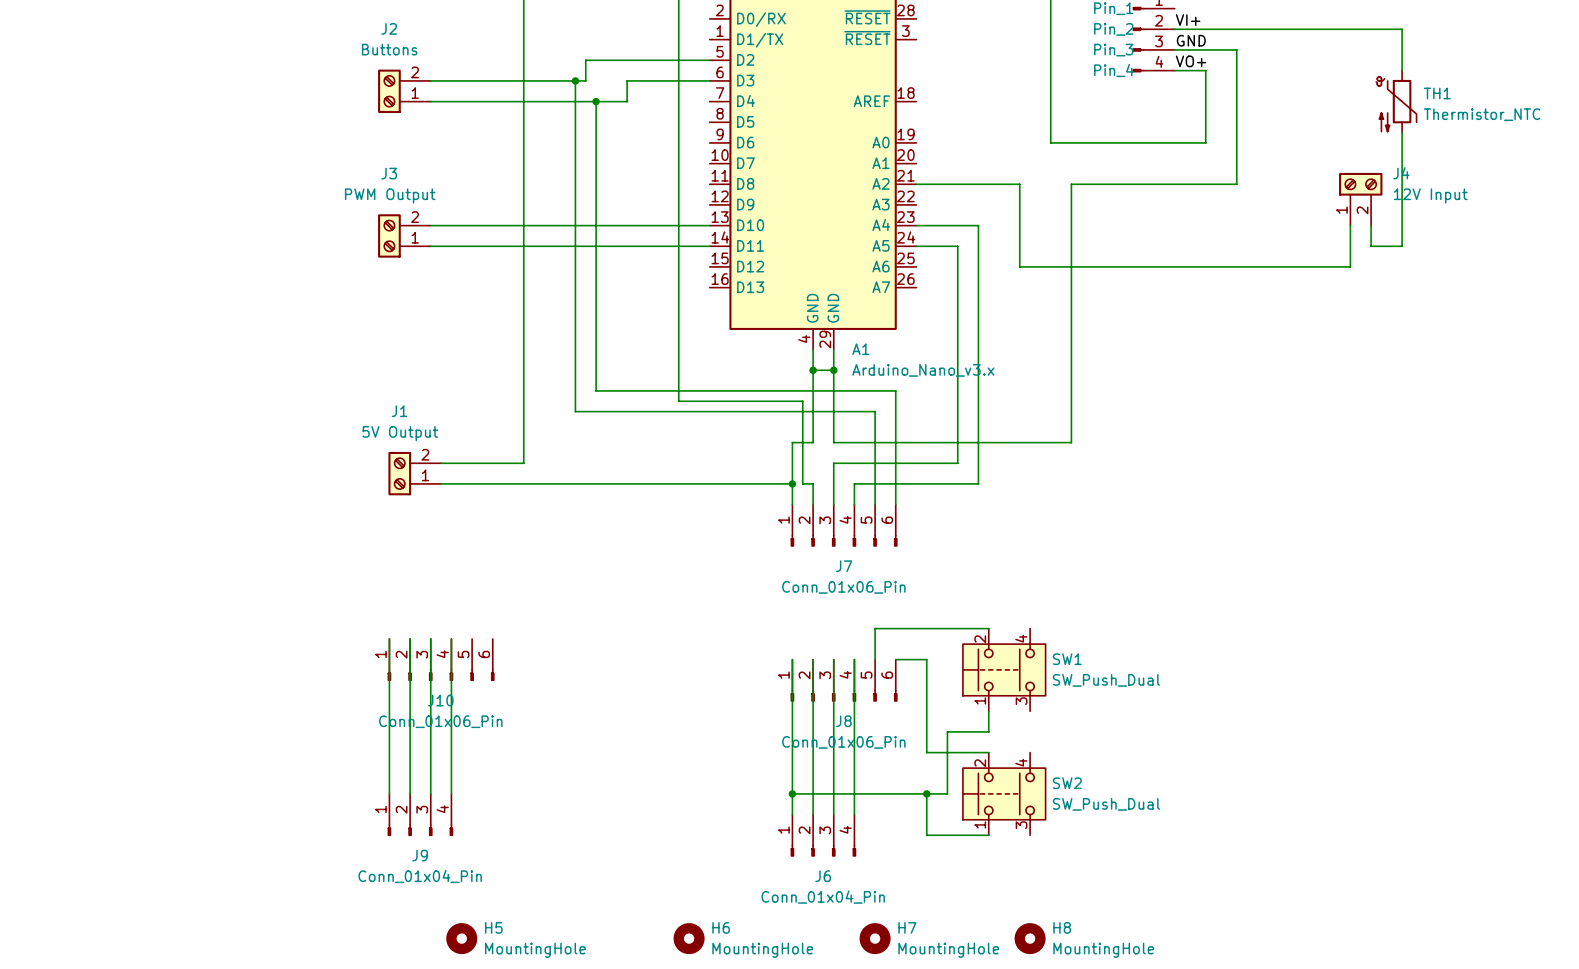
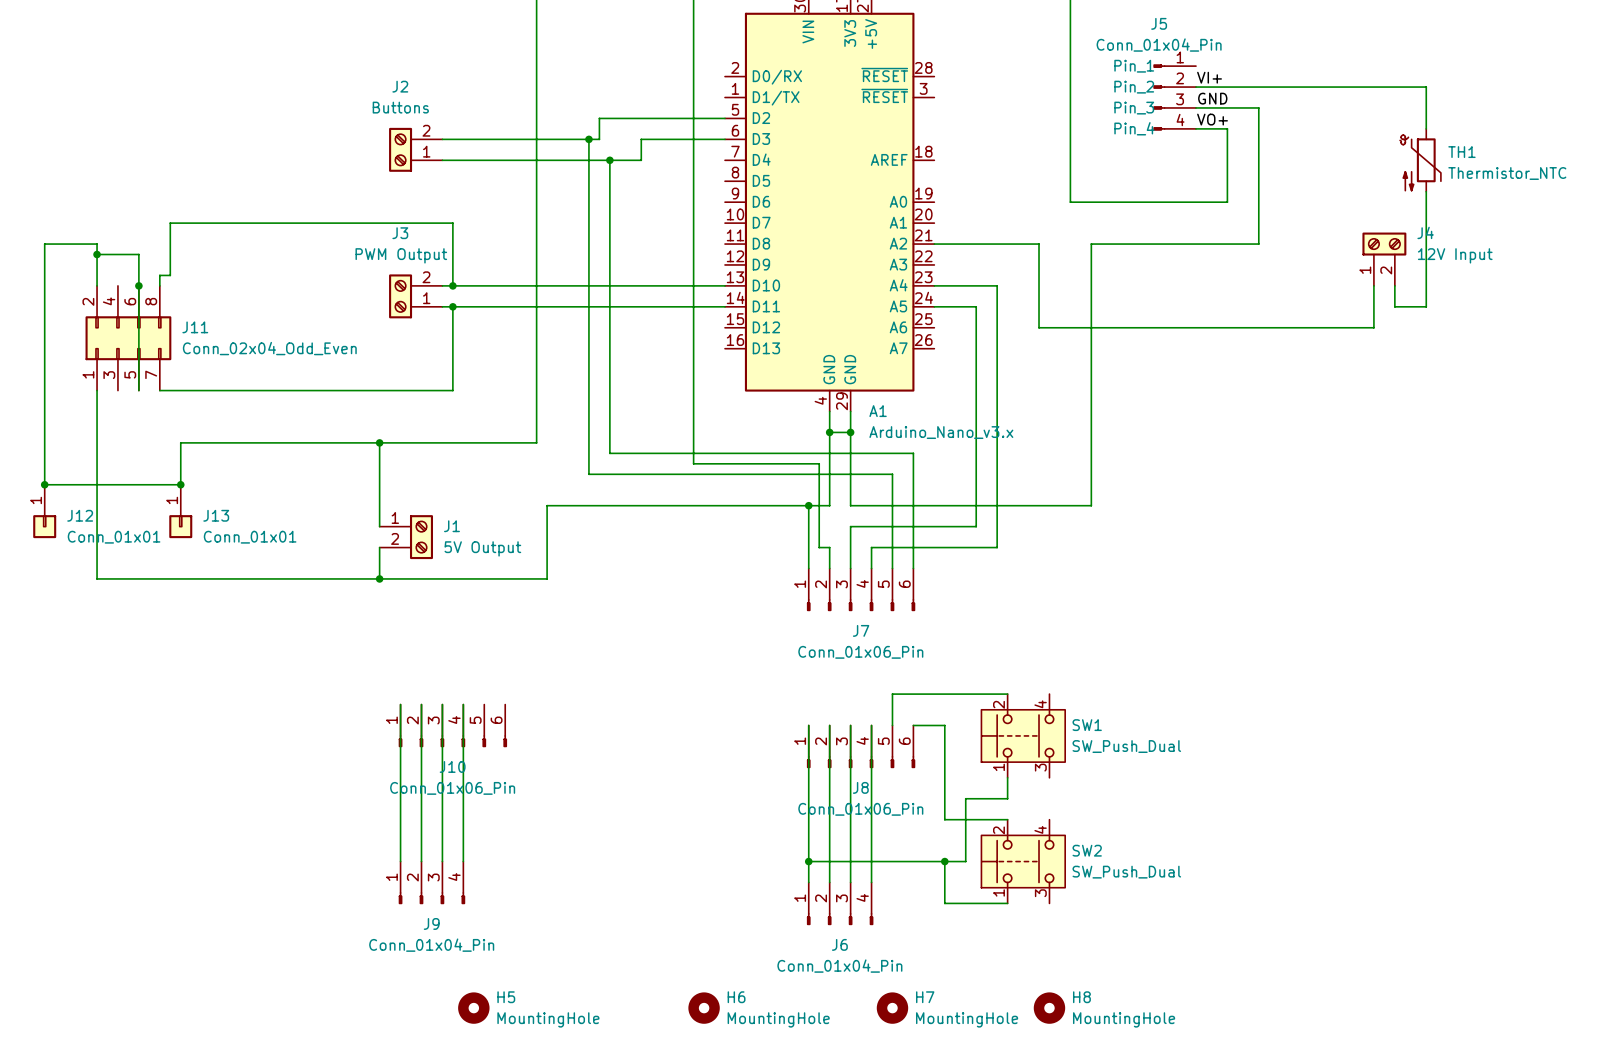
wire: none -> (97, 254) (138, 254) (138, 390)
junction: none -> (97, 254)
junction: none -> (138, 285)
wire: none -> (159, 285) (159, 275) (170, 275) (170, 223) (452, 223) (452, 285)
junction: none -> (452, 285)
wire: none -> (452, 306) (452, 390) (159, 390)
junction: none -> (452, 306)
J11: none -> Conn_02x04_Odd_Even (128, 338)
wire: none -> (97, 390) (97, 578) (547, 578) (547, 505) (808, 505)
wire: none -> (379, 442) (379, 526)
junction: none -> (379, 442)
wire: (523, 380) (523, 463) (441, 463) -> (536, 442) (180, 442) (180, 484) (44, 484) (44, 244) (97, 244) (97, 285)
J1 name position: J1 (399, 411) -> J1 (451, 526)
junction: none -> (44, 484)
junction: none -> (180, 484)
J1 value position: 5V Output (400, 433) -> 5V Output (482, 548)
J12: none -> Conn_01x01 (44, 511)
J13: none -> Conn_01x01 (180, 511)
J1 rotation: 0° (399, 473) -> 180° (421, 537)
wire: none -> (379, 547) (379, 578)
wire: (441, 483) (792, 483) -> none
junction position: (792, 483) -> (808, 505)
junction: none -> (379, 578)

